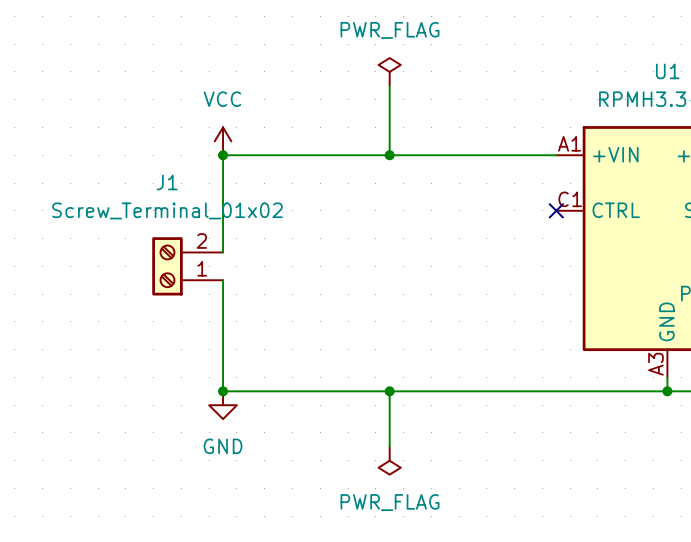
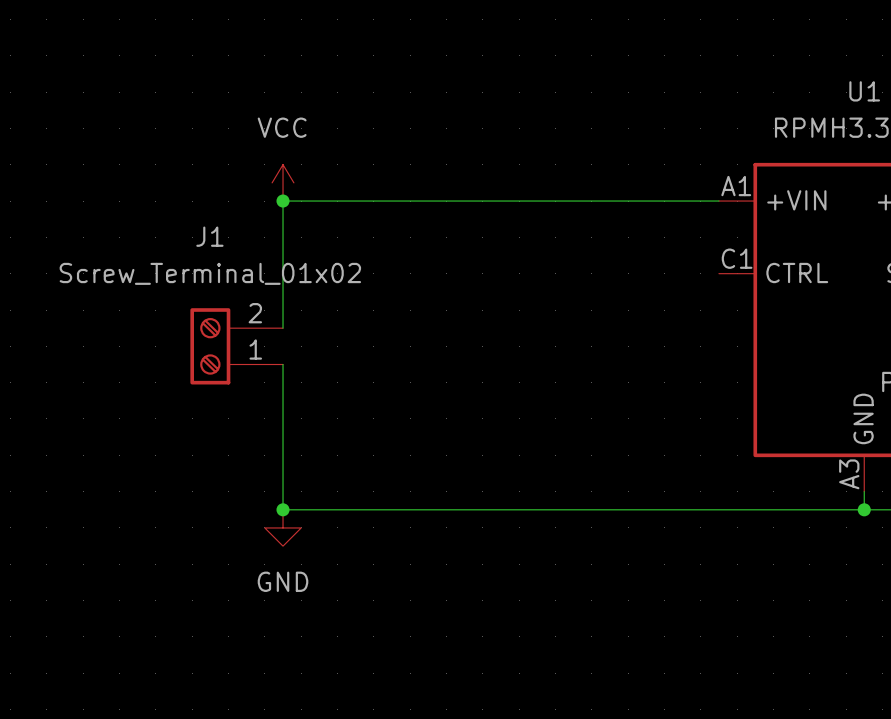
power symbol: PWR_FLAG (389, 71) -> none
wire: (389, 85) (389, 155) -> none
junction: (389, 155) -> none
no-connect mark: (556, 210) -> none
wire: (389, 391) (389, 446) -> none
junction: (389, 391) -> none
power symbol: PWR_FLAG (389, 460) -> none

